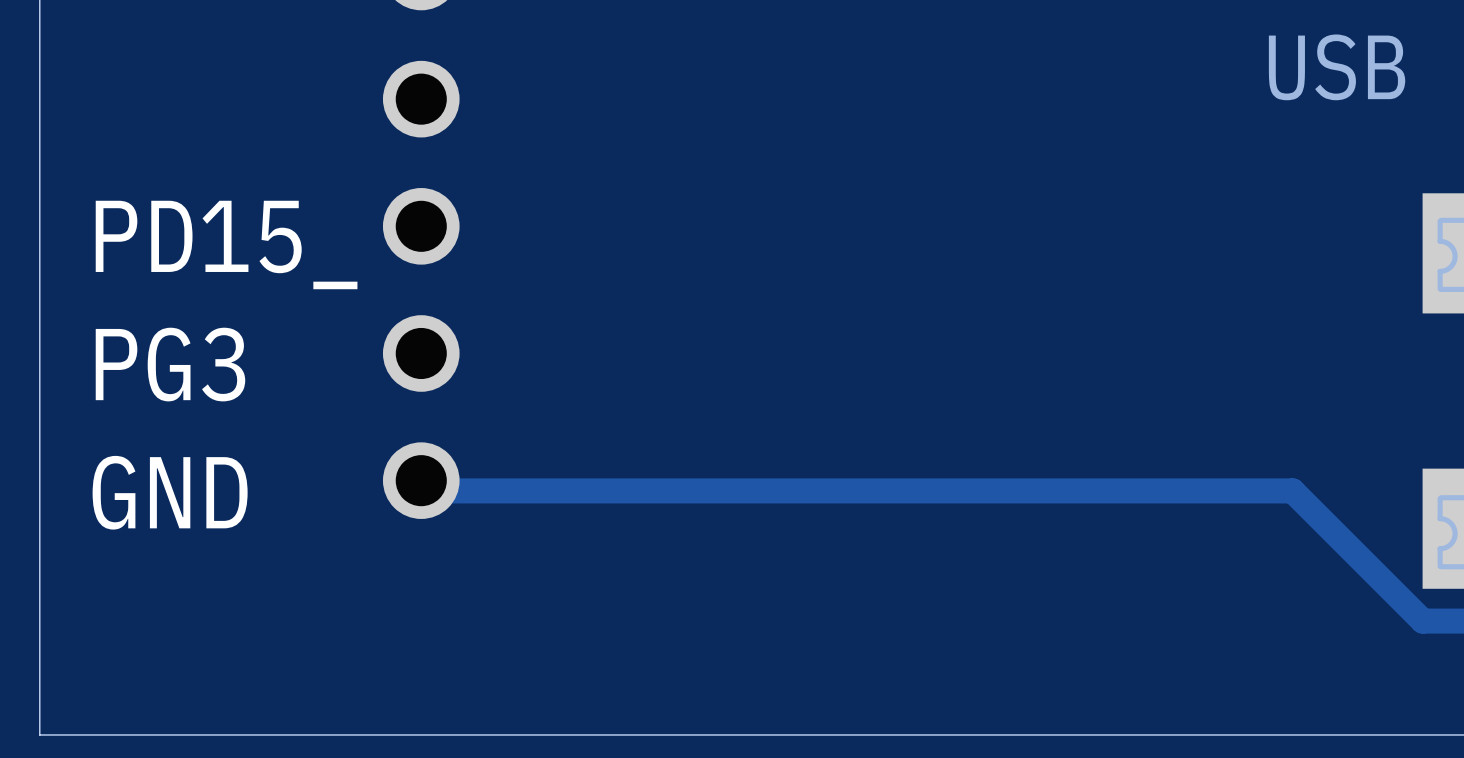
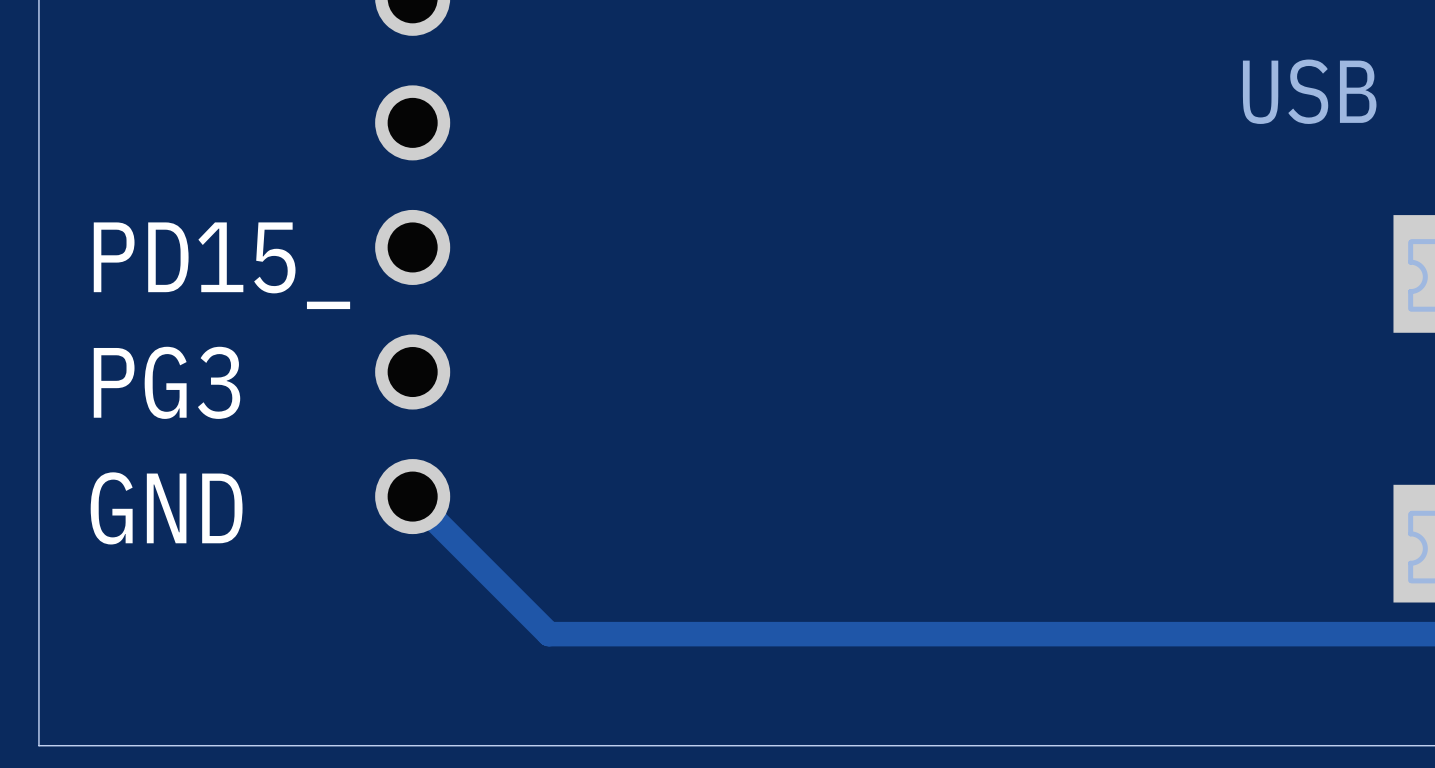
track: (430, 490) (1292, 490) (1422, 621) -> (421, 506) (548, 634) (1393, 634)

